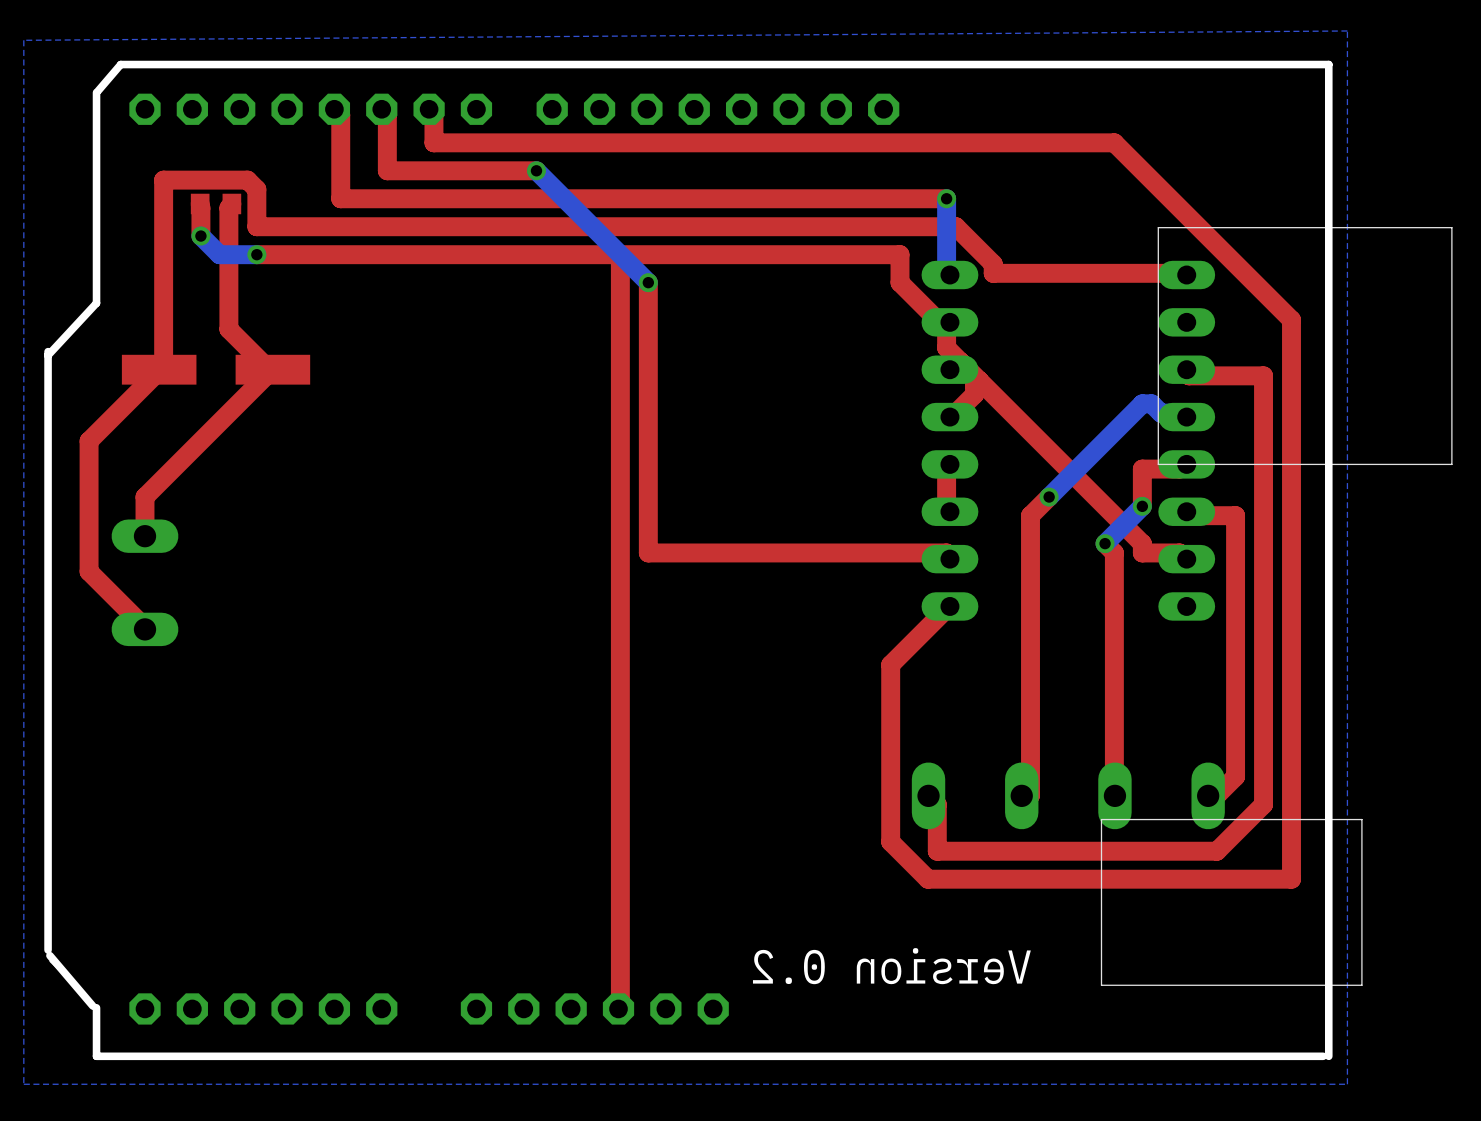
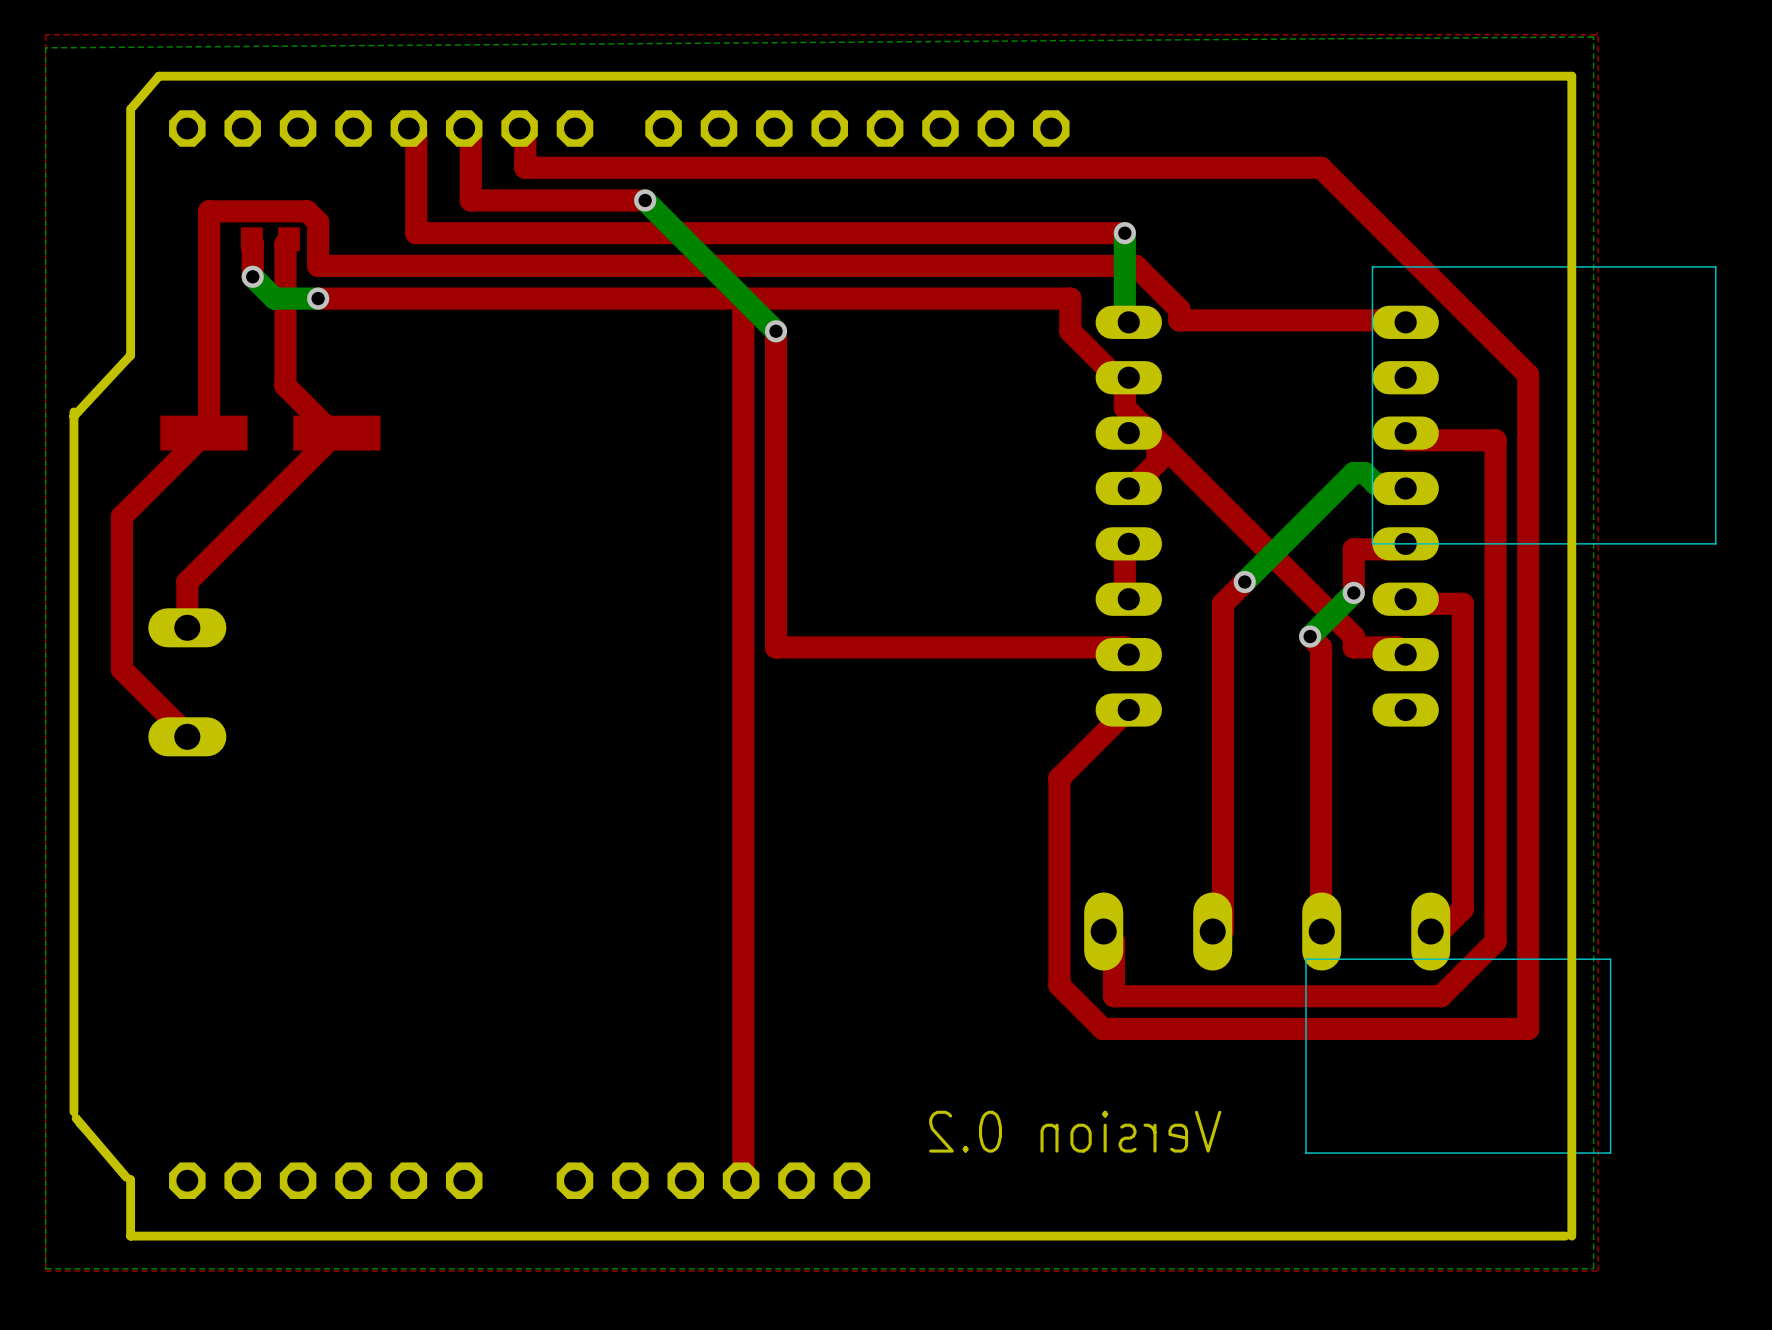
top zone outline: none -> (1597, 32) (1597, 1270) (45, 1270) (45, 34) (1595, 34) (1597, 32)

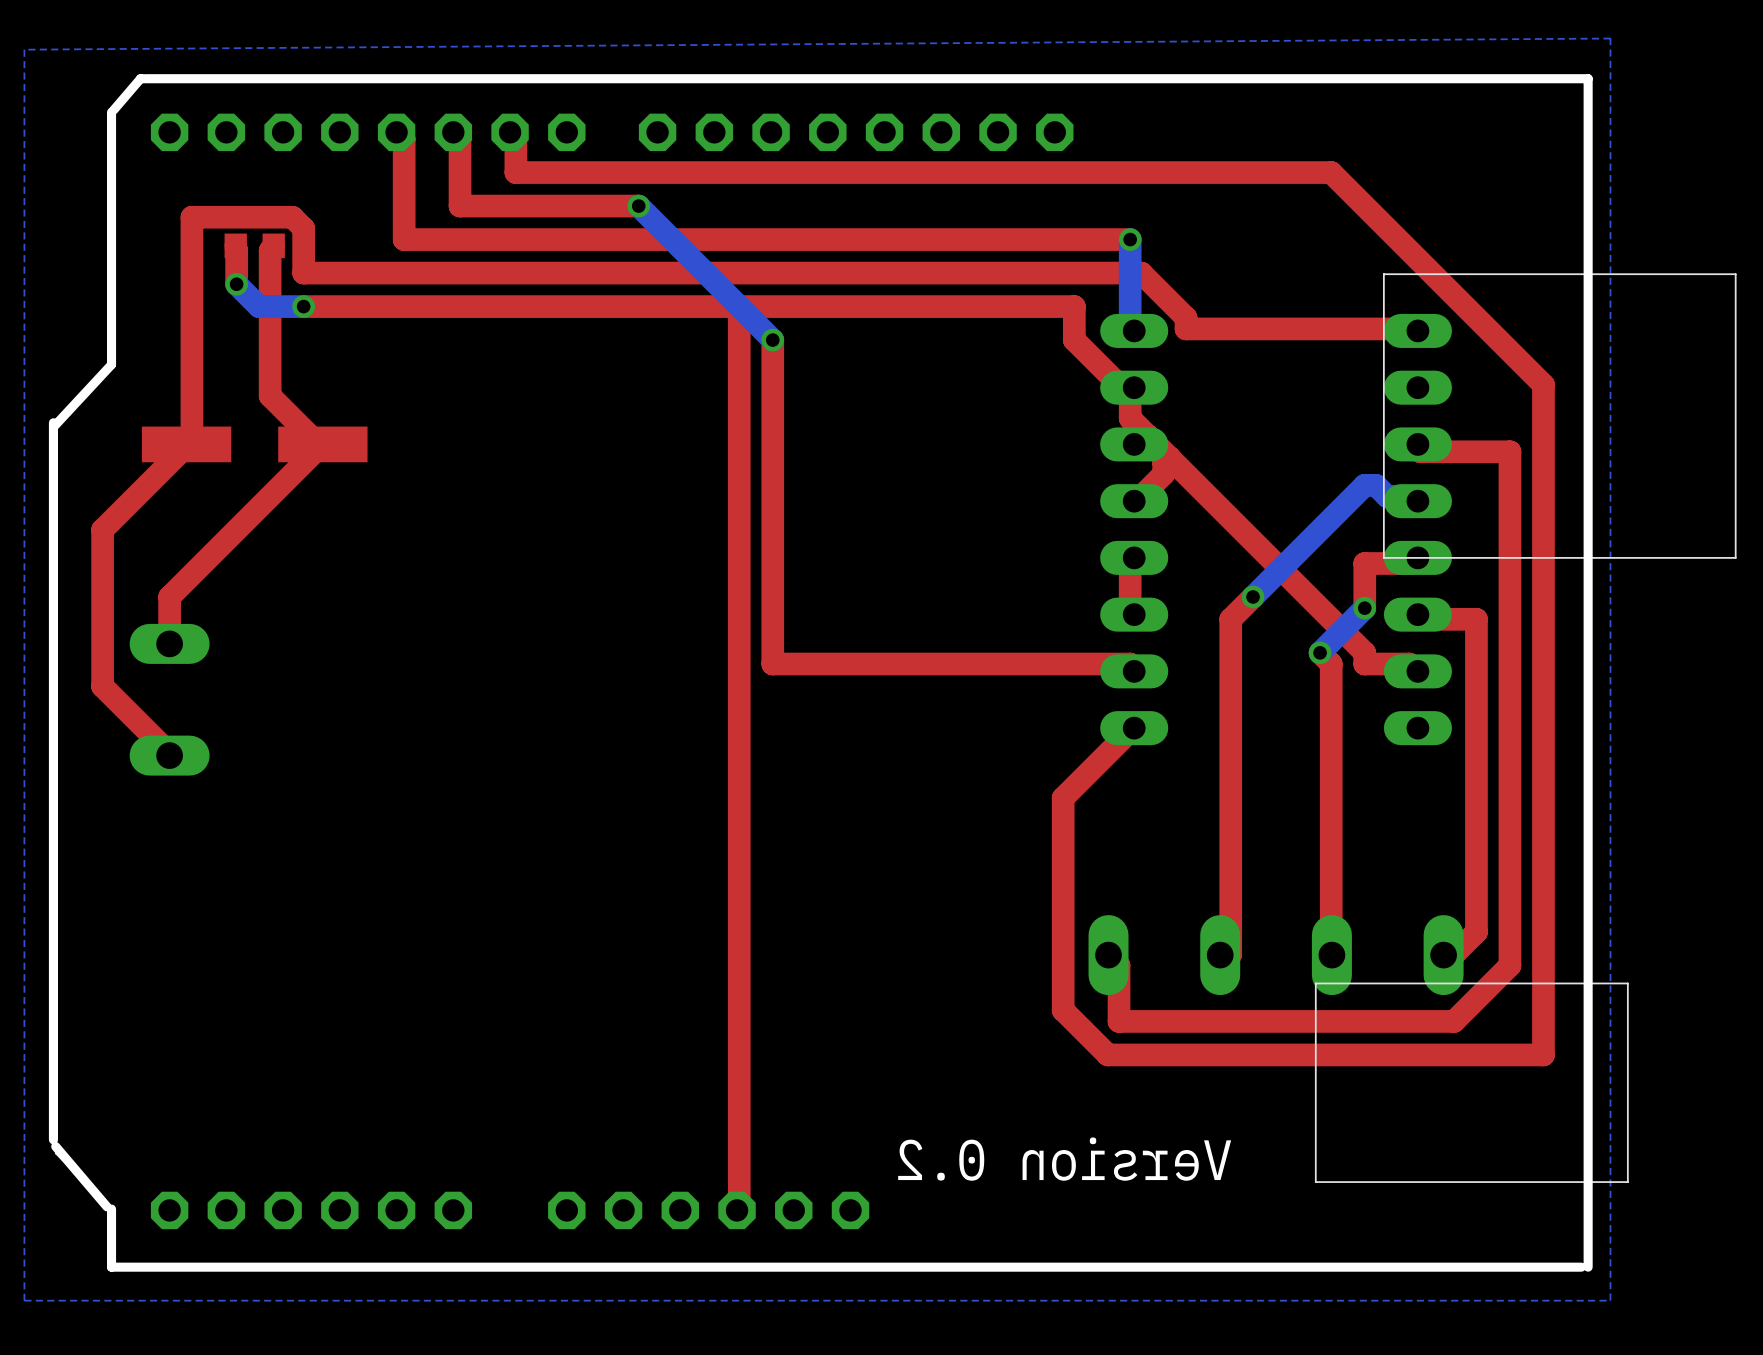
top zone outline: (1597, 32) (1597, 1270) (45, 1270) (45, 34) (1595, 34) (1597, 32) -> none

